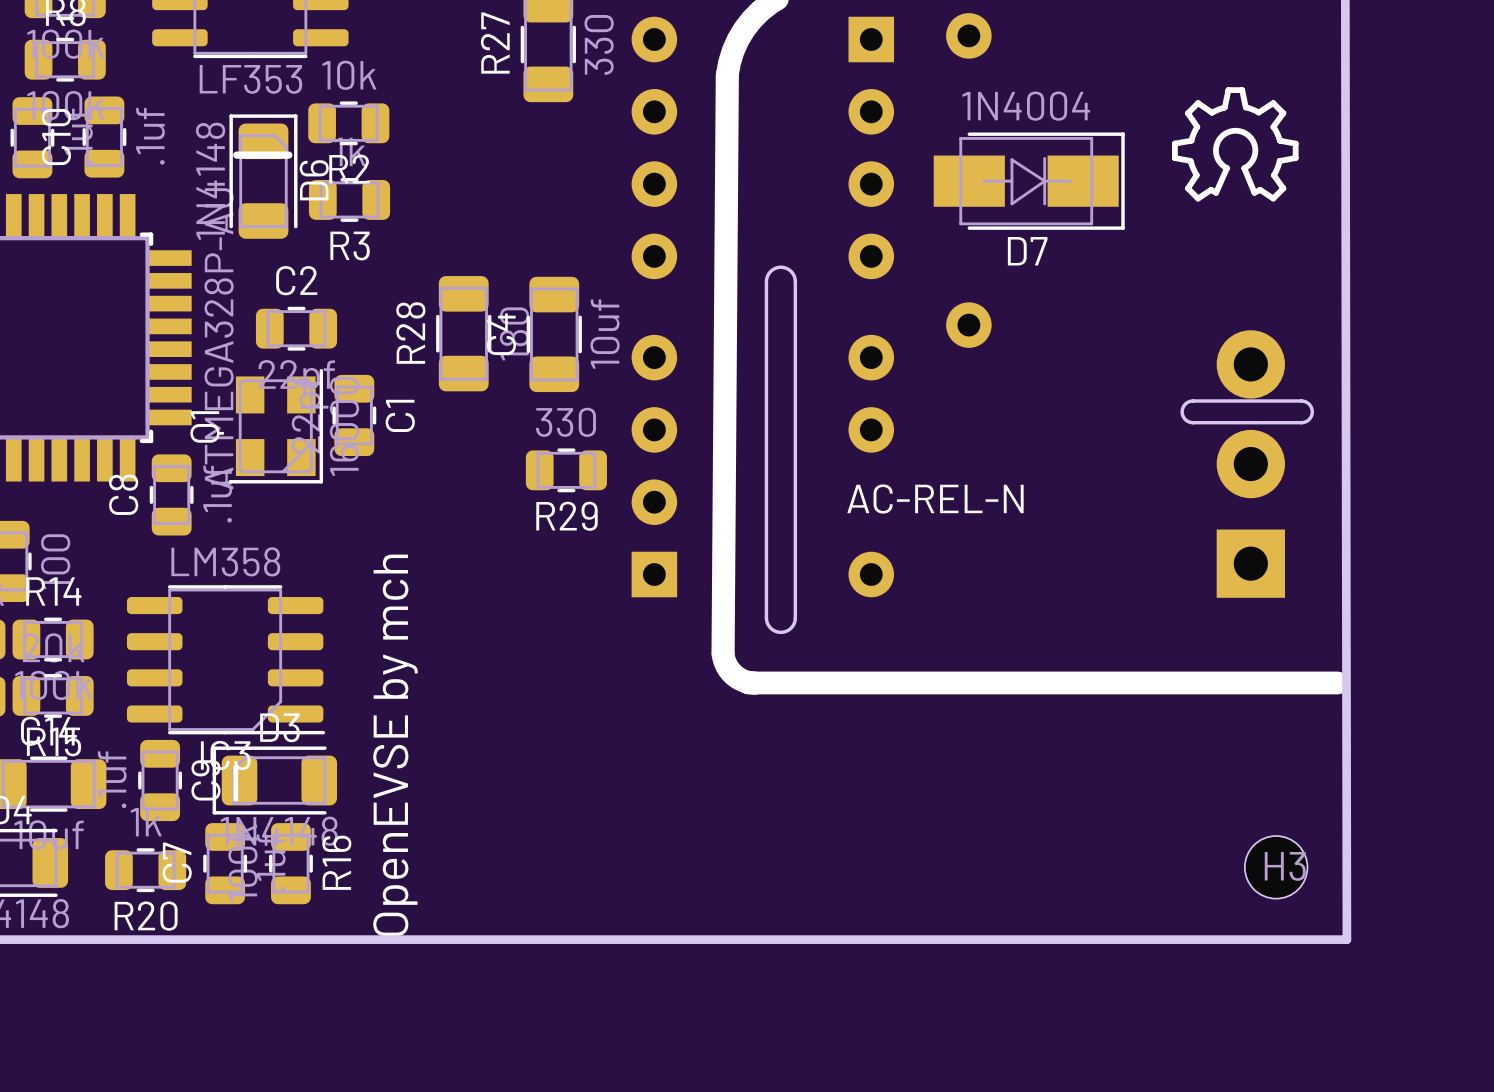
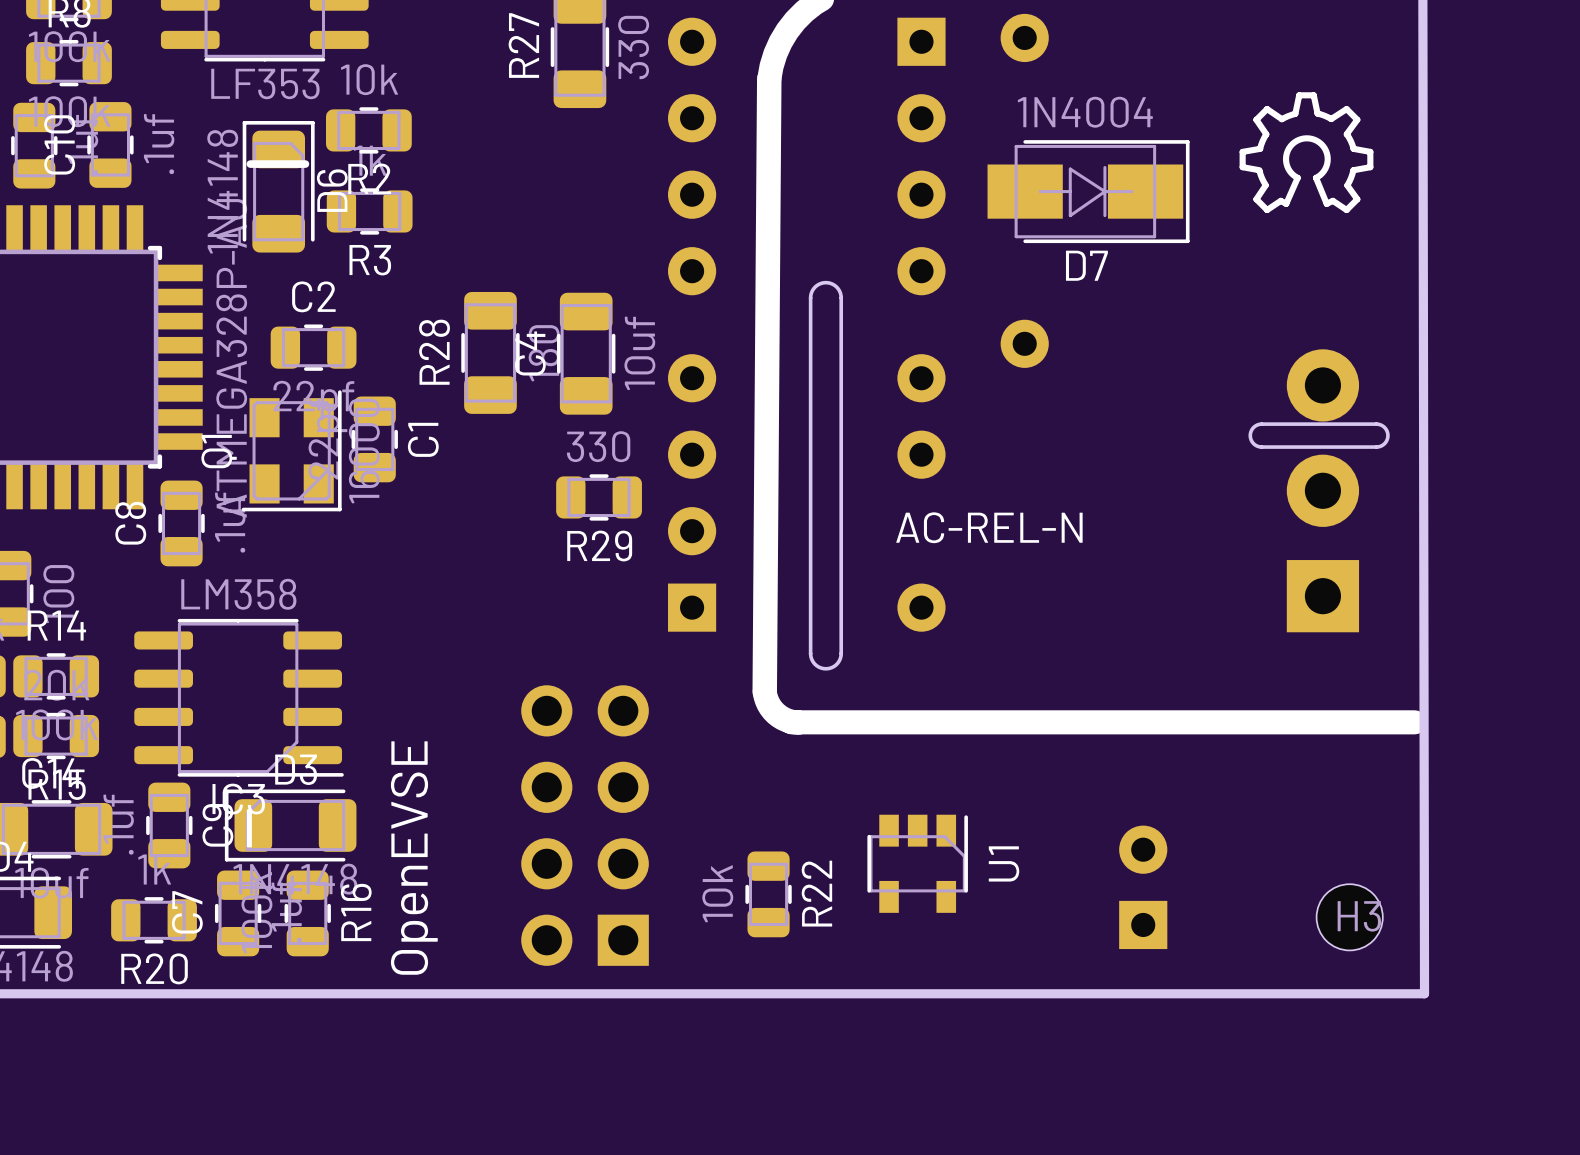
text: OpenEVSE by mch (395, 745) -> OpenEVSE (414, 858)
part: none -> (585, 825)
U1: none -> (917, 863)
part: none -> (1143, 887)
R22: none -> 10k (768, 894)

